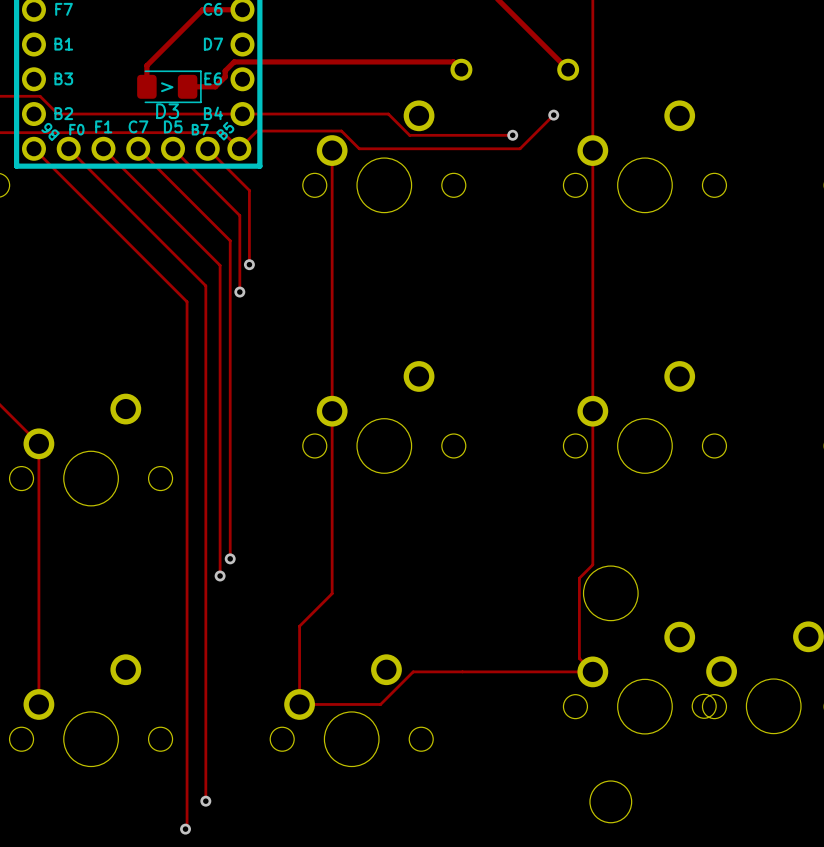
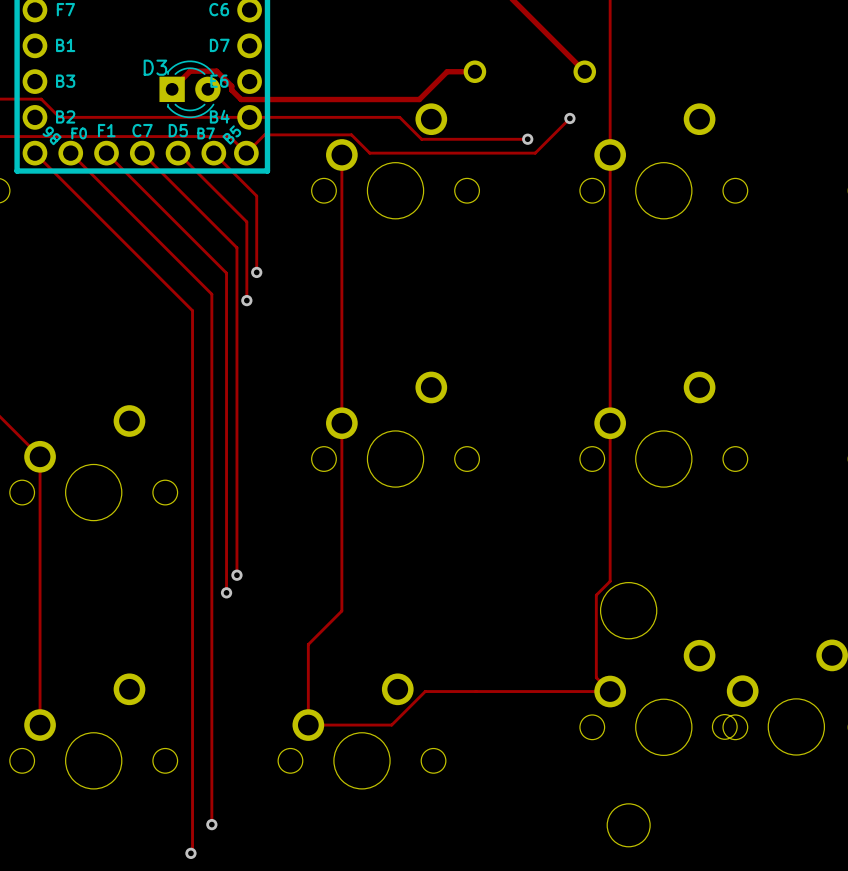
track: (242, 9) (202, 9) (146, 65) (146, 86) -> none
track: (461, 69) (453, 61) (234, 61) (225, 70) (225, 77) (215, 86) (187, 86) -> (474, 71) (447, 71) (419, 99) (241, 99) (231, 90) (231, 86) (216, 71) (190, 71) (172, 89)
D3 footprint: [137, 70, 202, 104] -> [159, 60, 221, 119]
text: > (167, 87) -> none
D3 name position: D3 (167, 111) -> D3 (155, 67)

